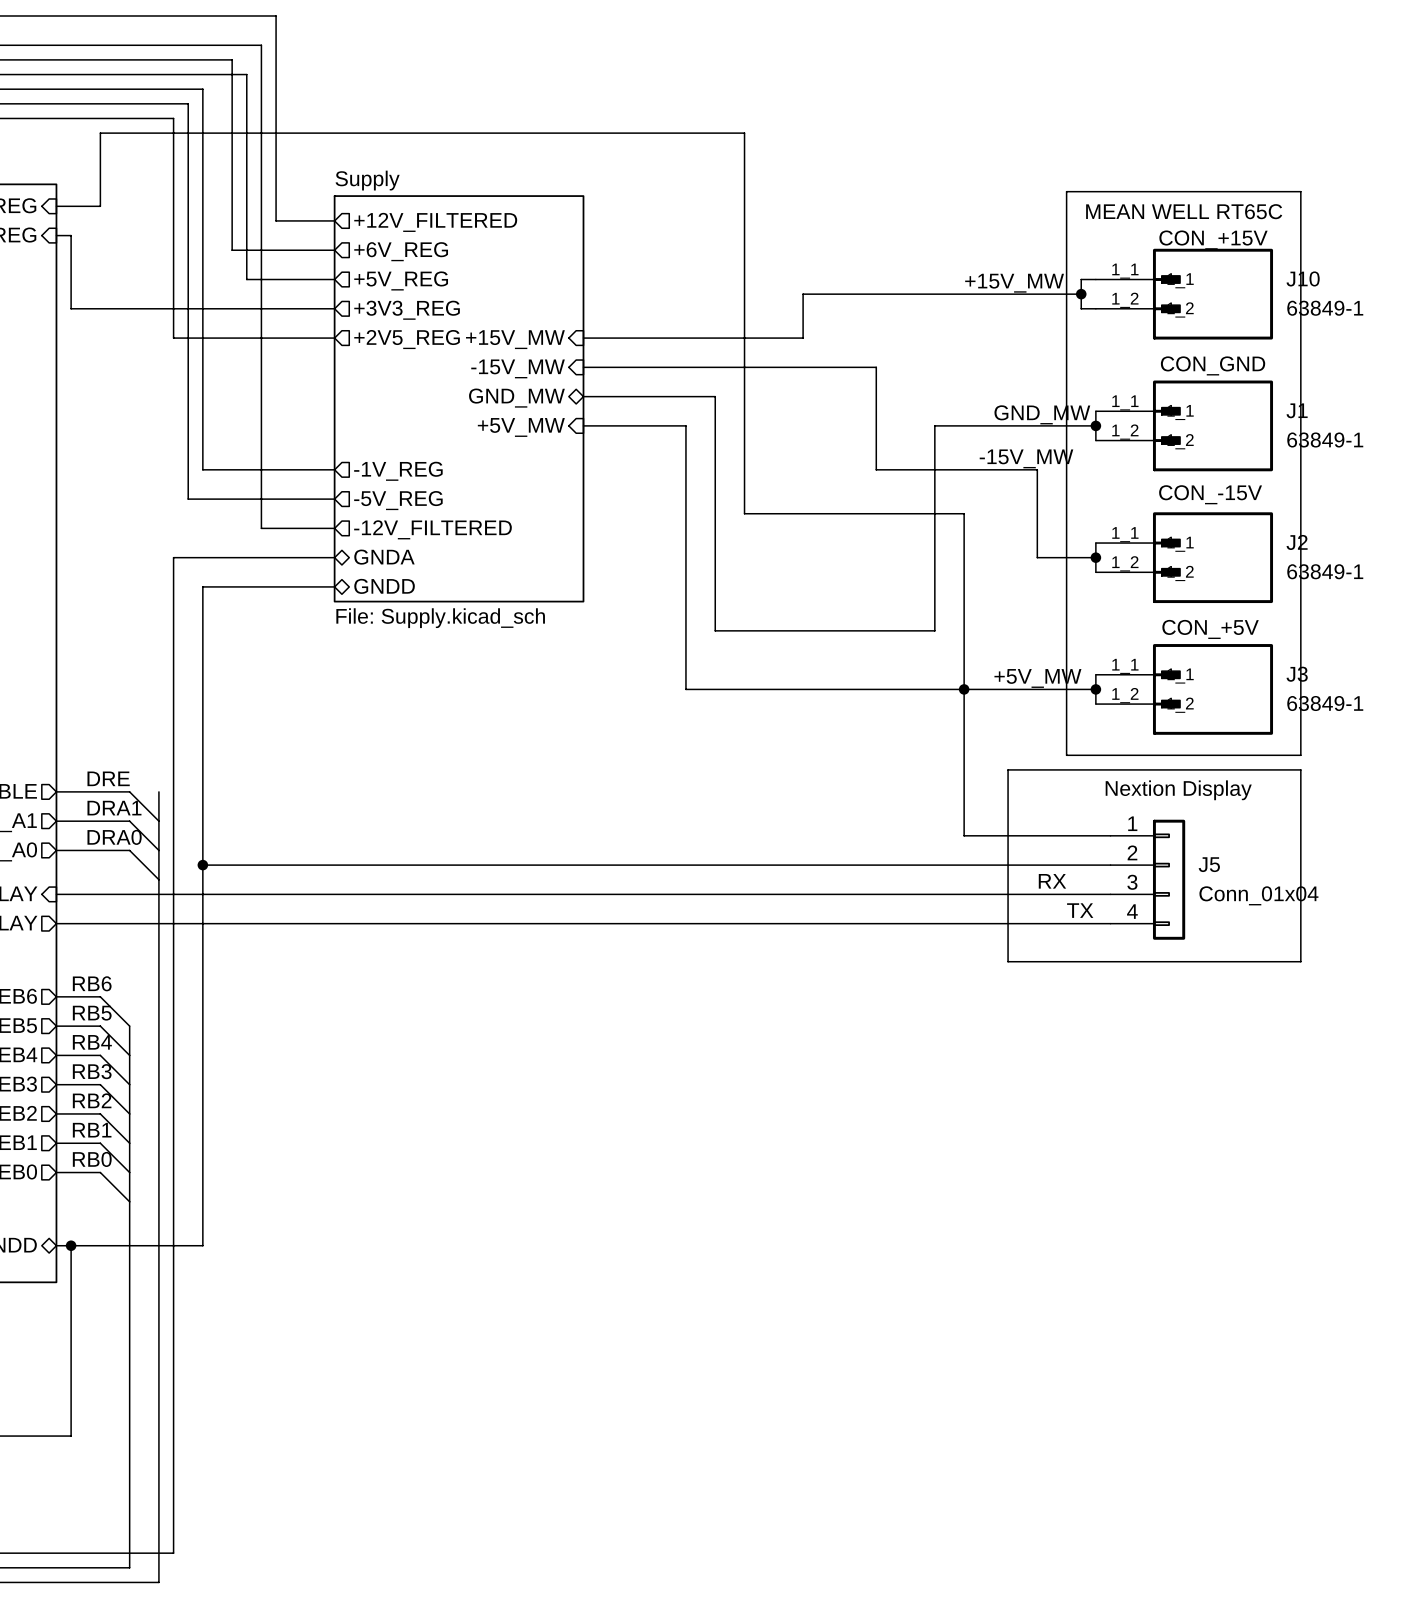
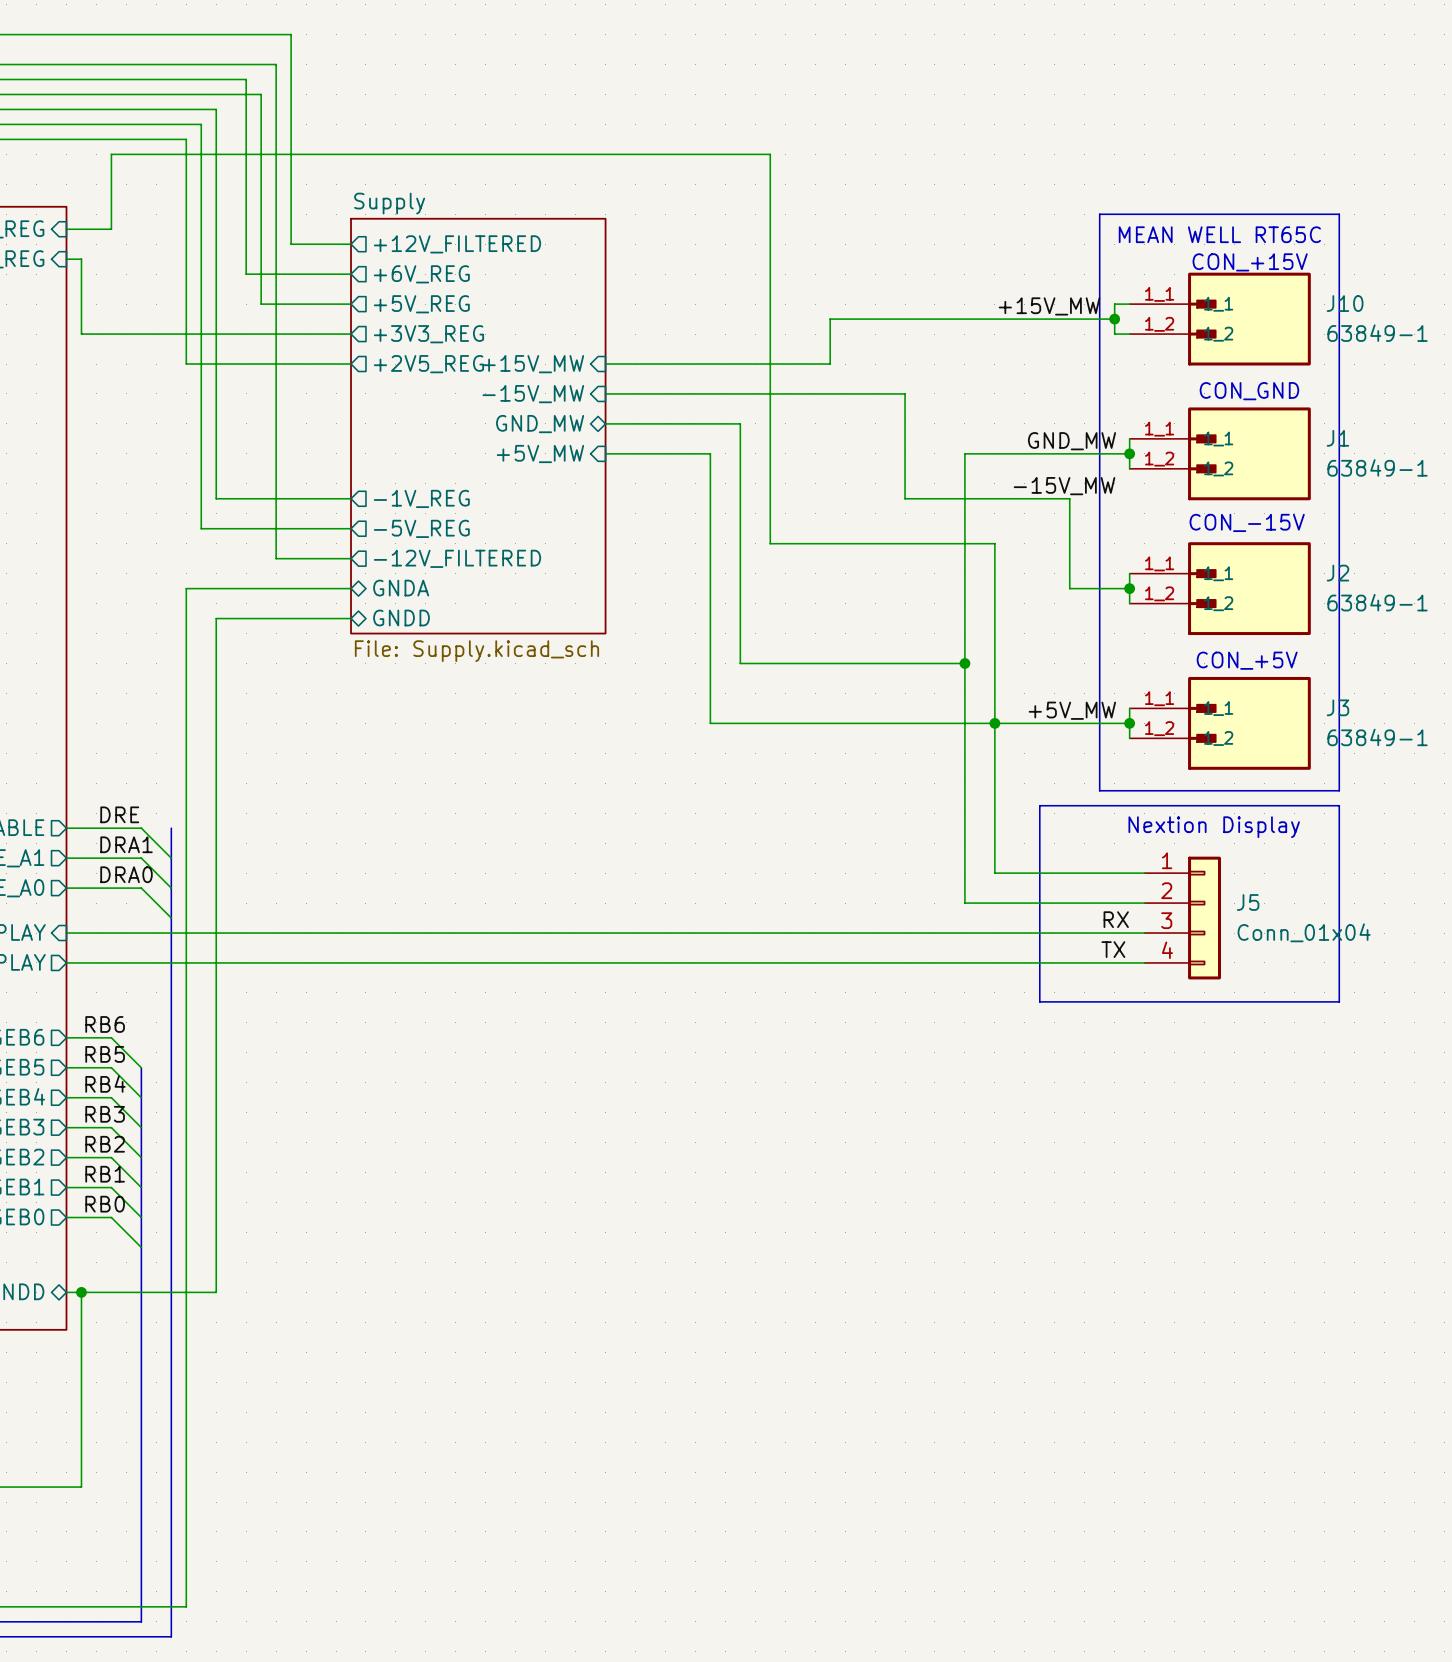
junction: none -> (964, 663)
wire: (202, 865) (934, 865) -> (964, 663) (964, 903)
junction: (202, 865) -> none
label position: RX (1052, 881) -> RX (1116, 919)

